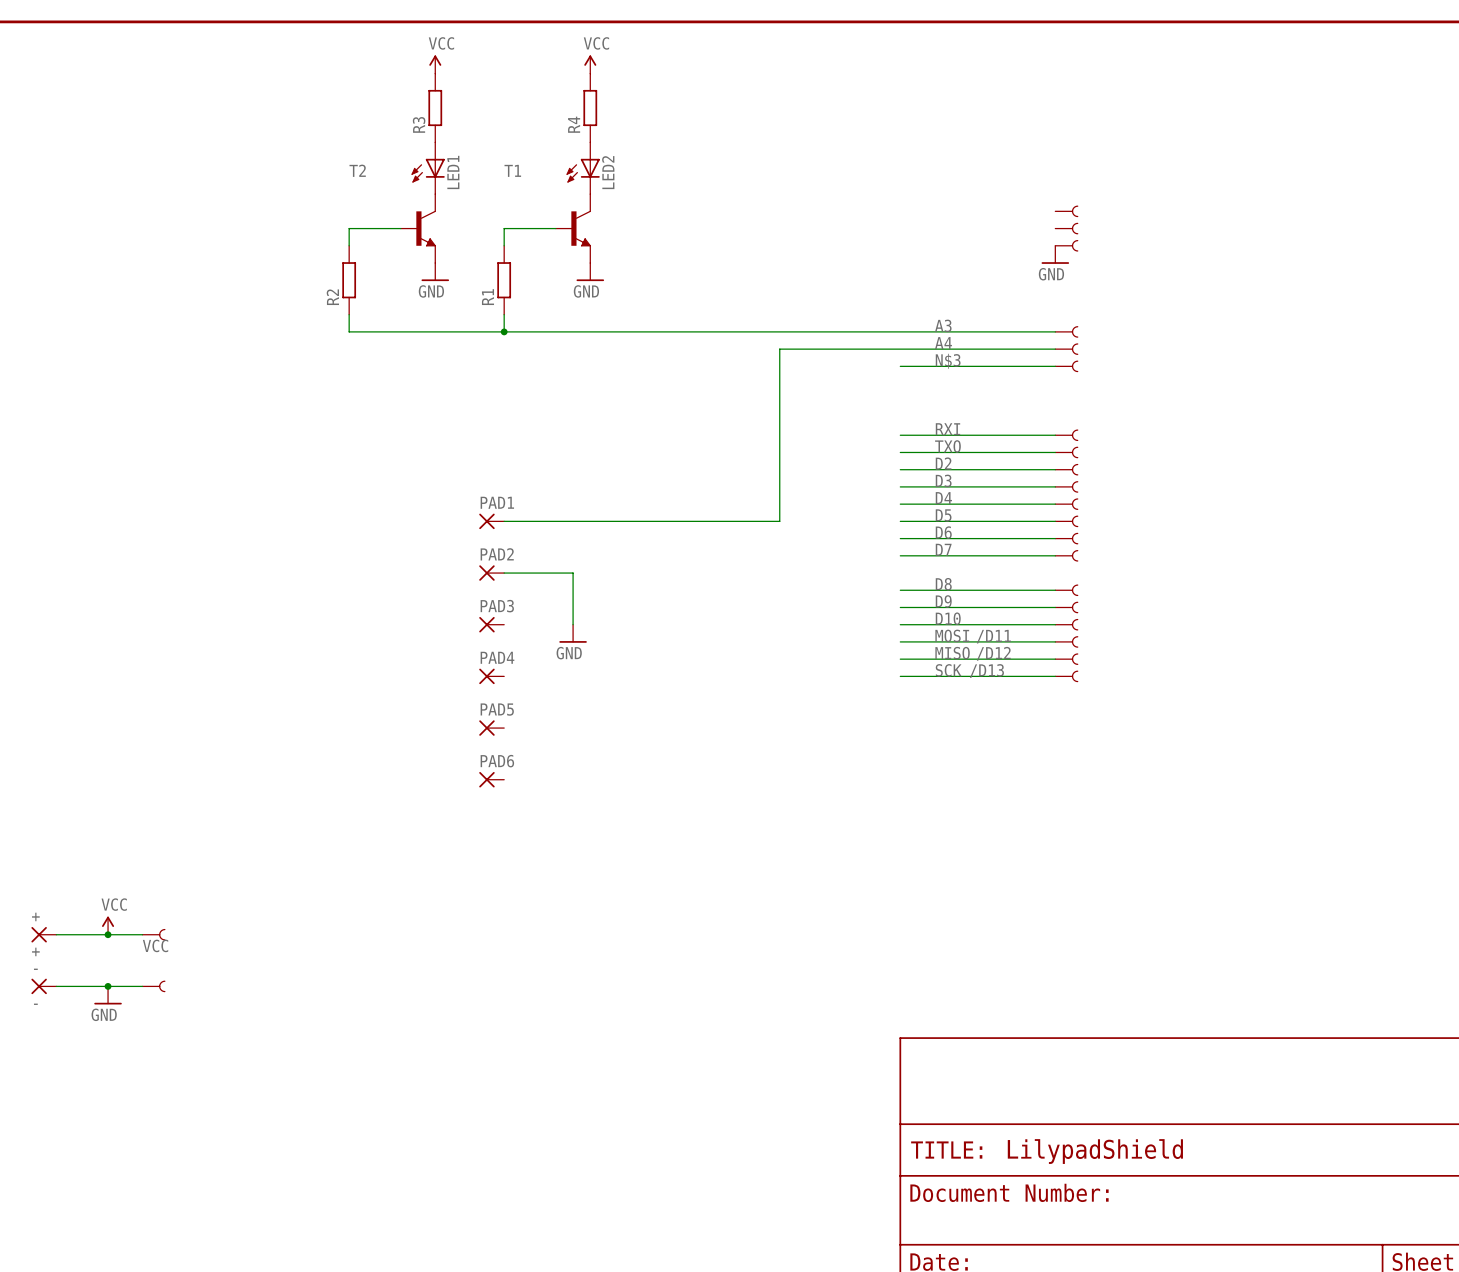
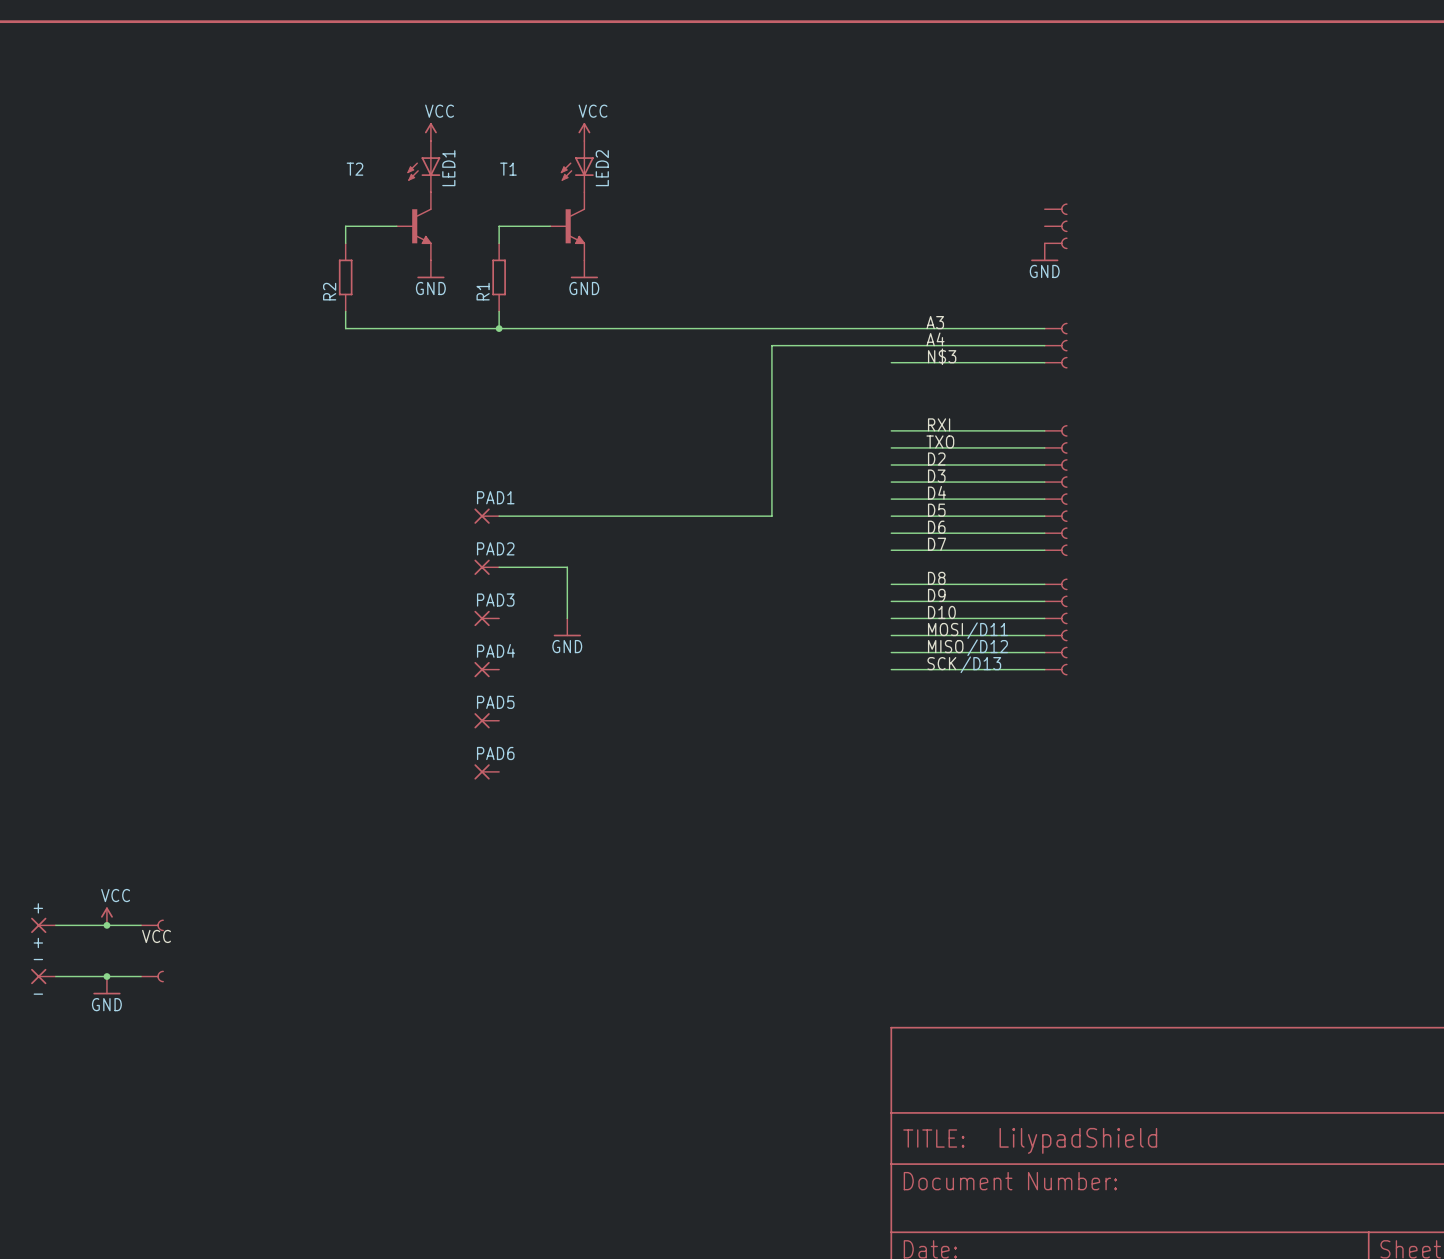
power symbol position: VCC (435, 64) -> VCC (430, 132)
power symbol position: VCC (590, 64) -> VCC (584, 132)
R3: (435, 108) -> none
R4: (590, 108) -> none

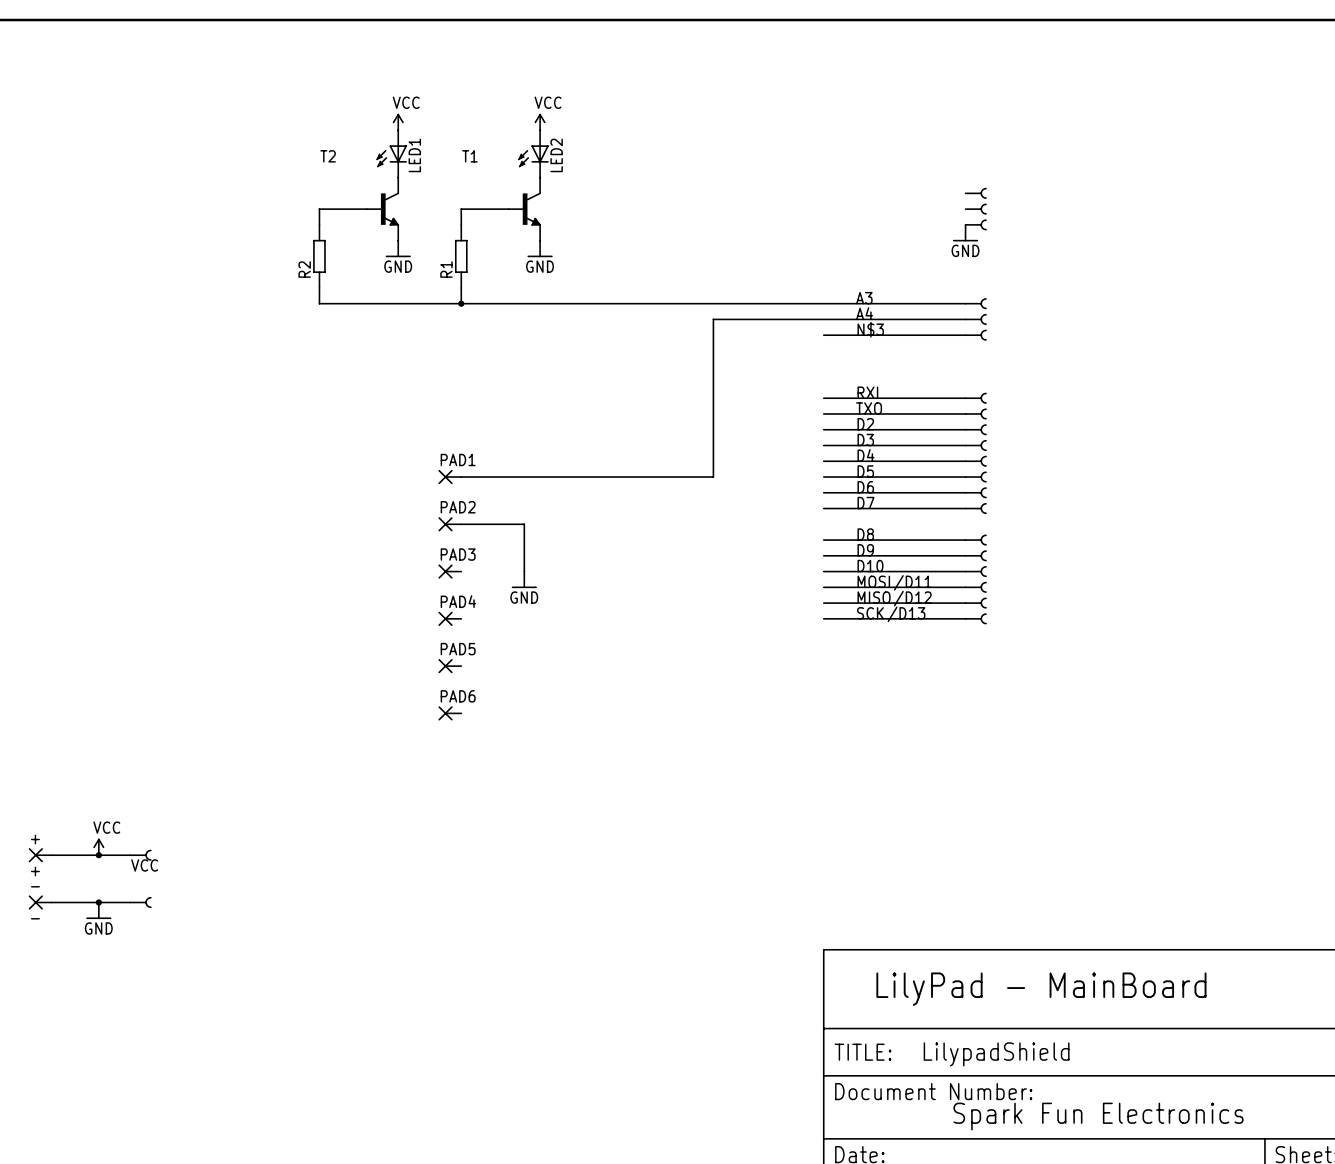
text: none -> LilyPad - MainBoard (1041, 989)
text: none -> Spark Fun Electronics (1098, 1116)

